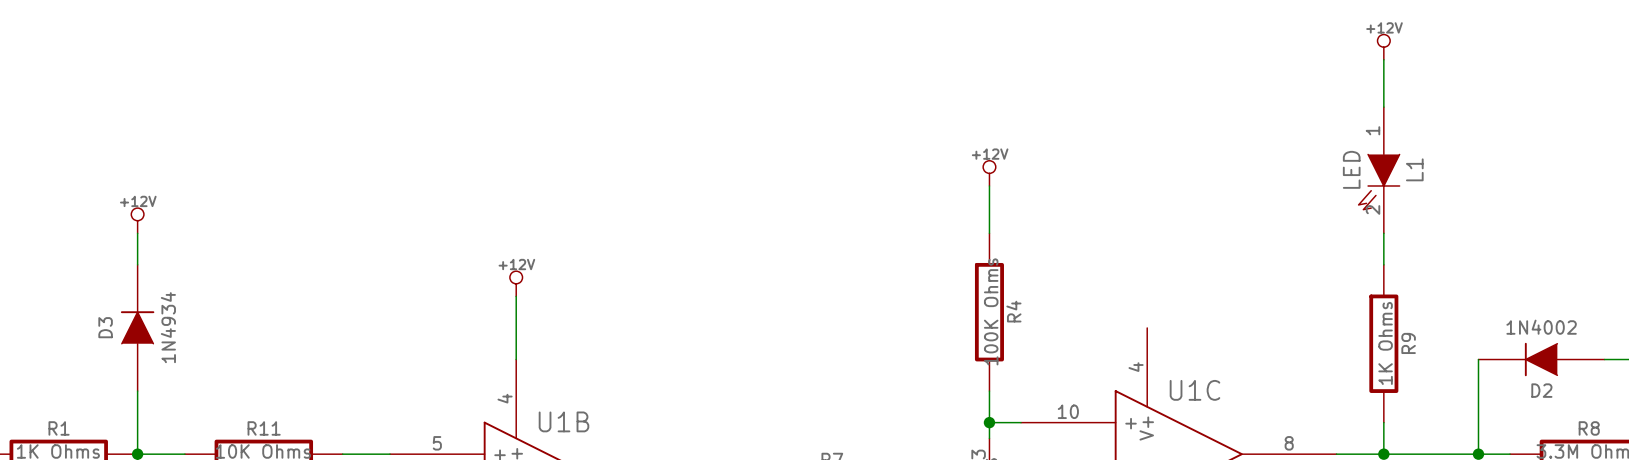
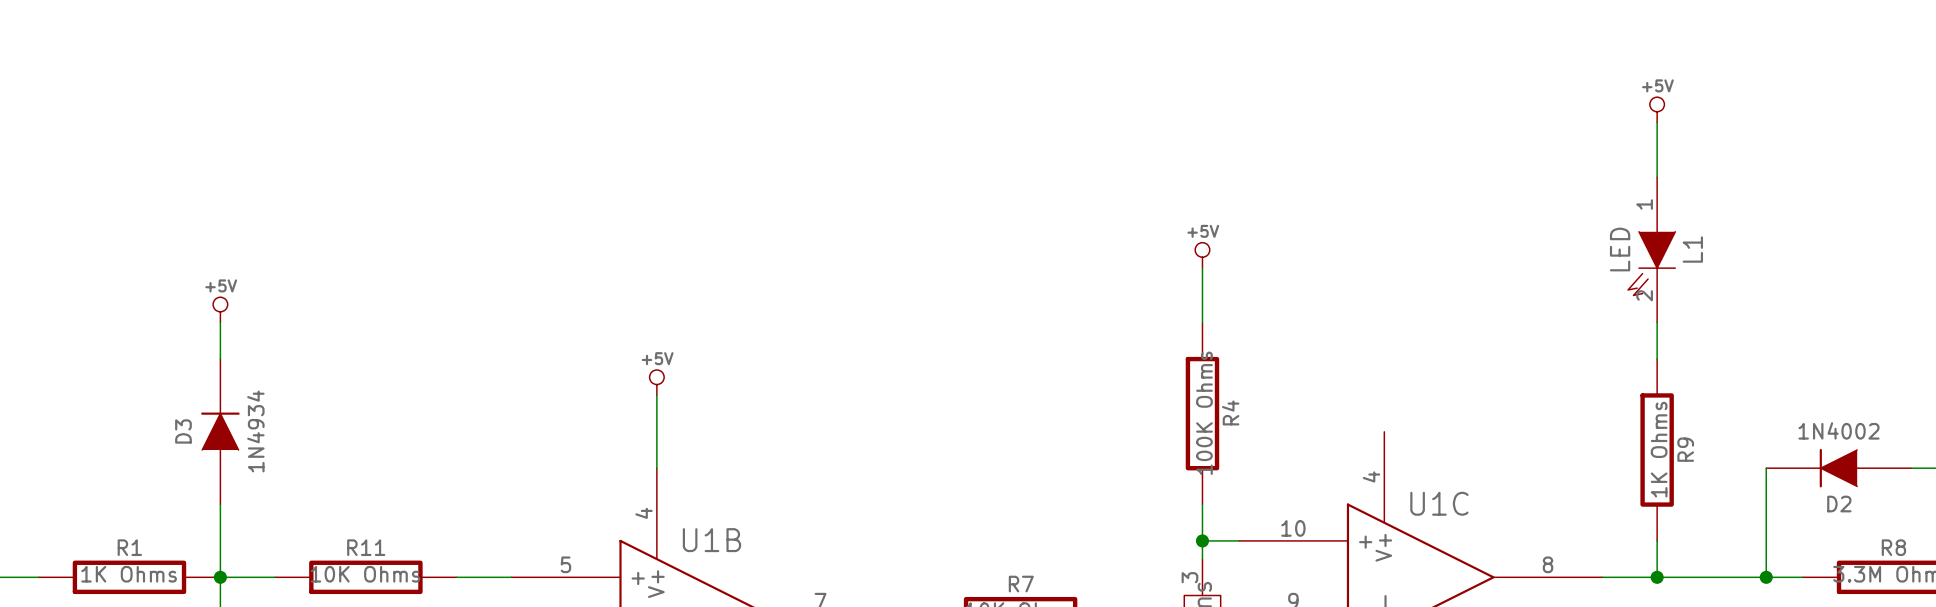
power symbol: +12V (1383, 47) -> +5V (1657, 109)
power symbol: +12V (989, 173) -> +5V (1202, 255)
power symbol: +12V (137, 220) -> +5V (220, 309)
power symbol: +12V (516, 283) -> +5V (656, 382)

